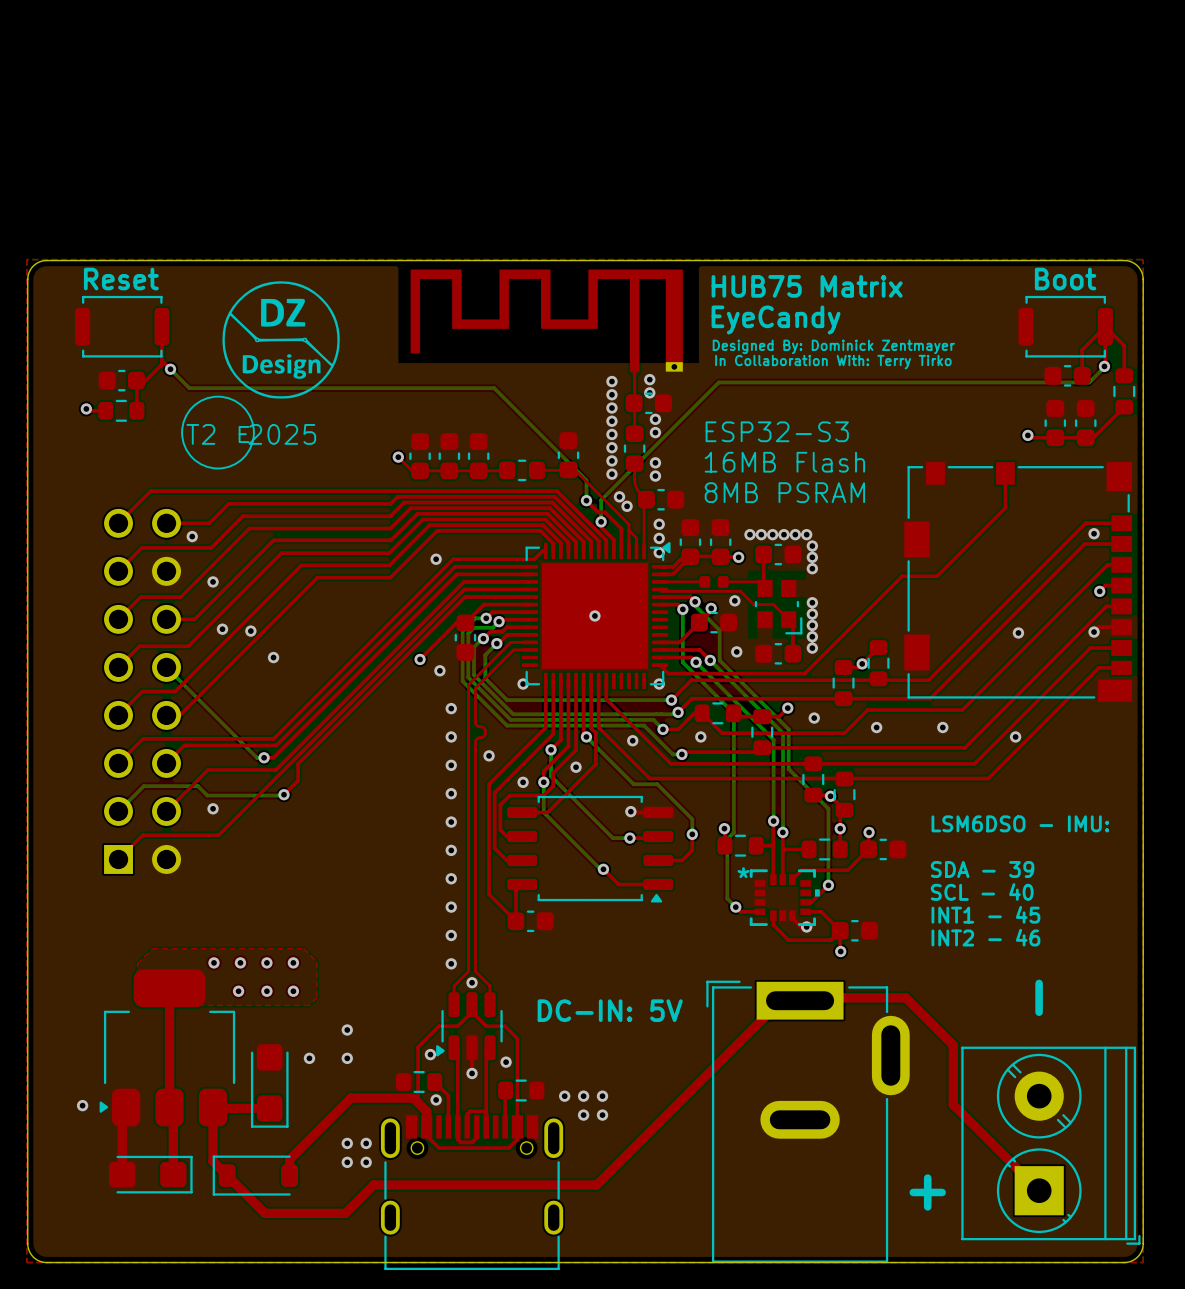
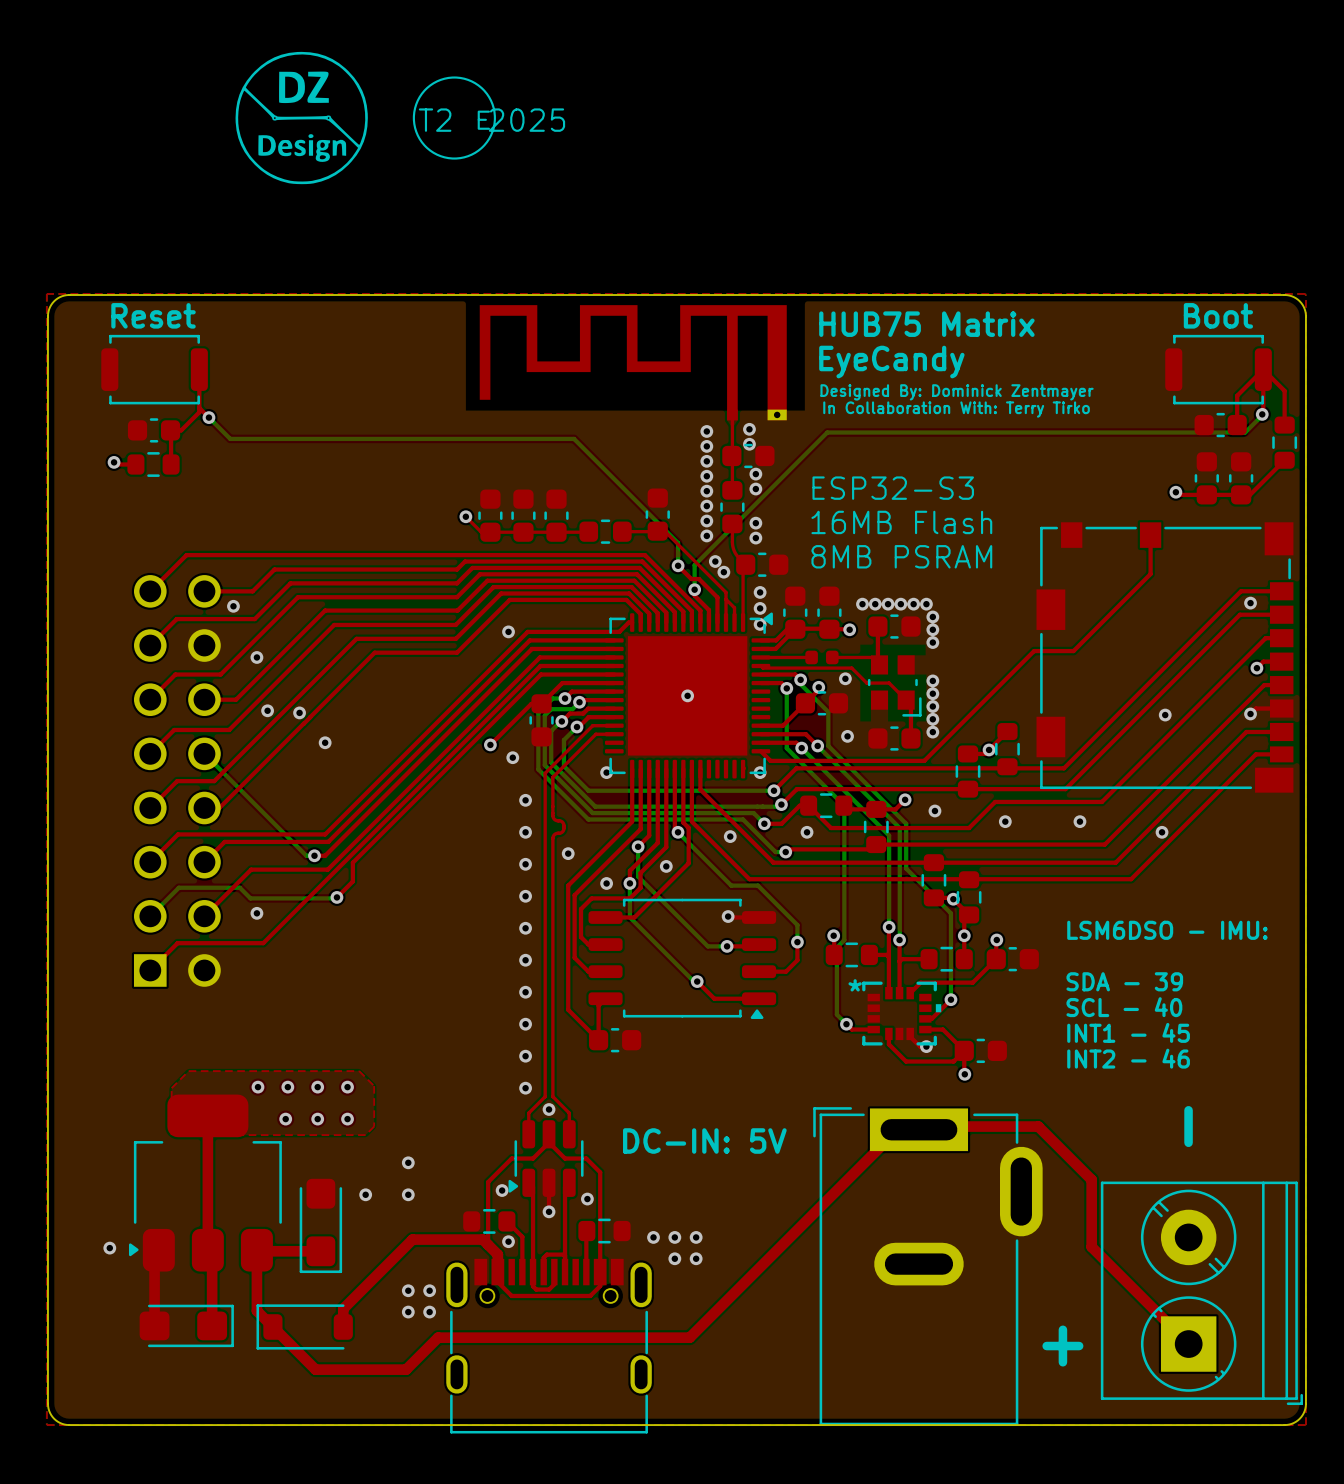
drawing position: (281, 339) -> (301, 118)
drawing position: (217, 432) -> (454, 118)
text position: E (244, 434) -> E (483, 120)
text position: T2 2025 (251, 434) -> T2 2025 (491, 120)

